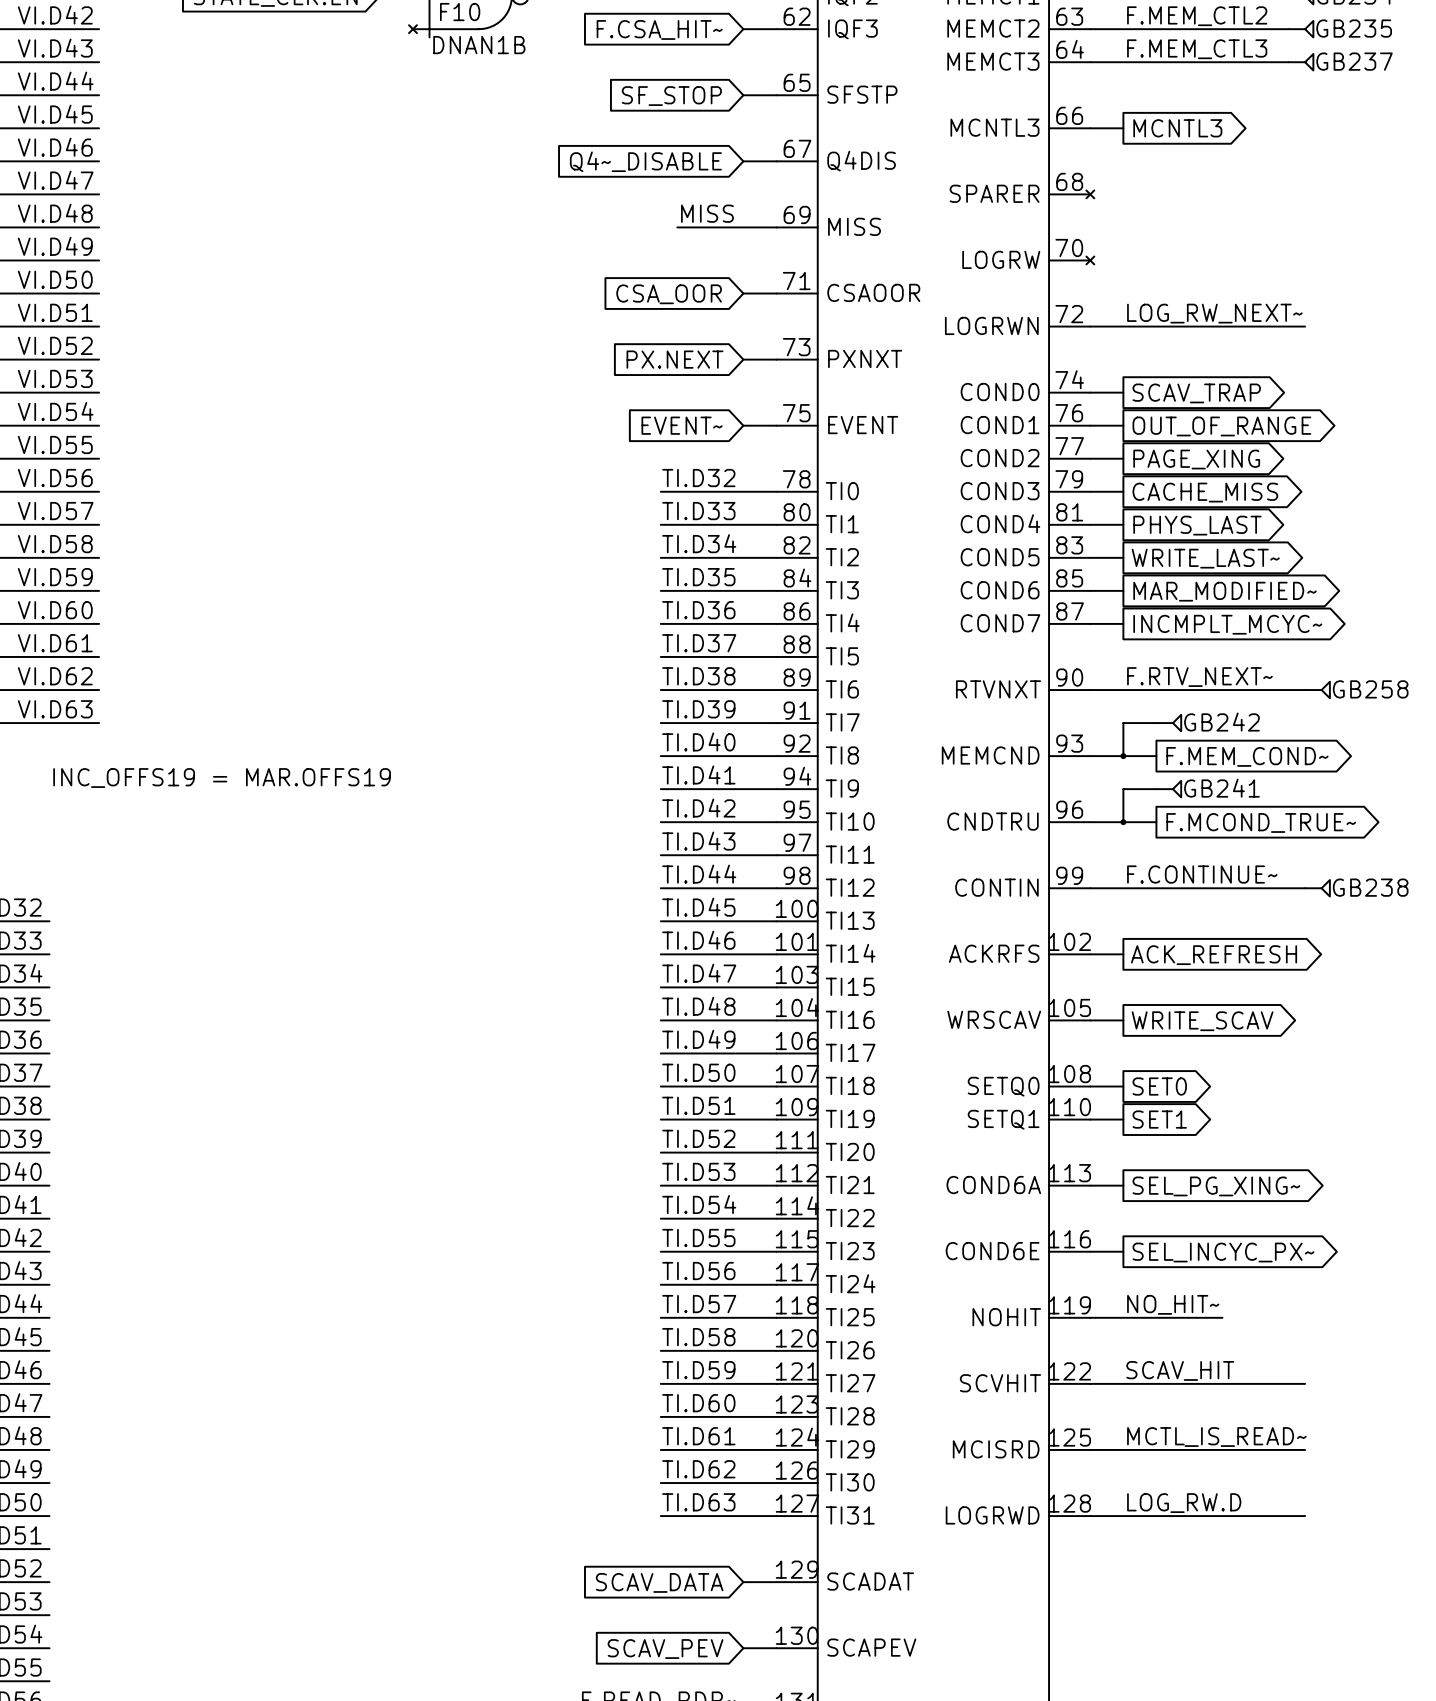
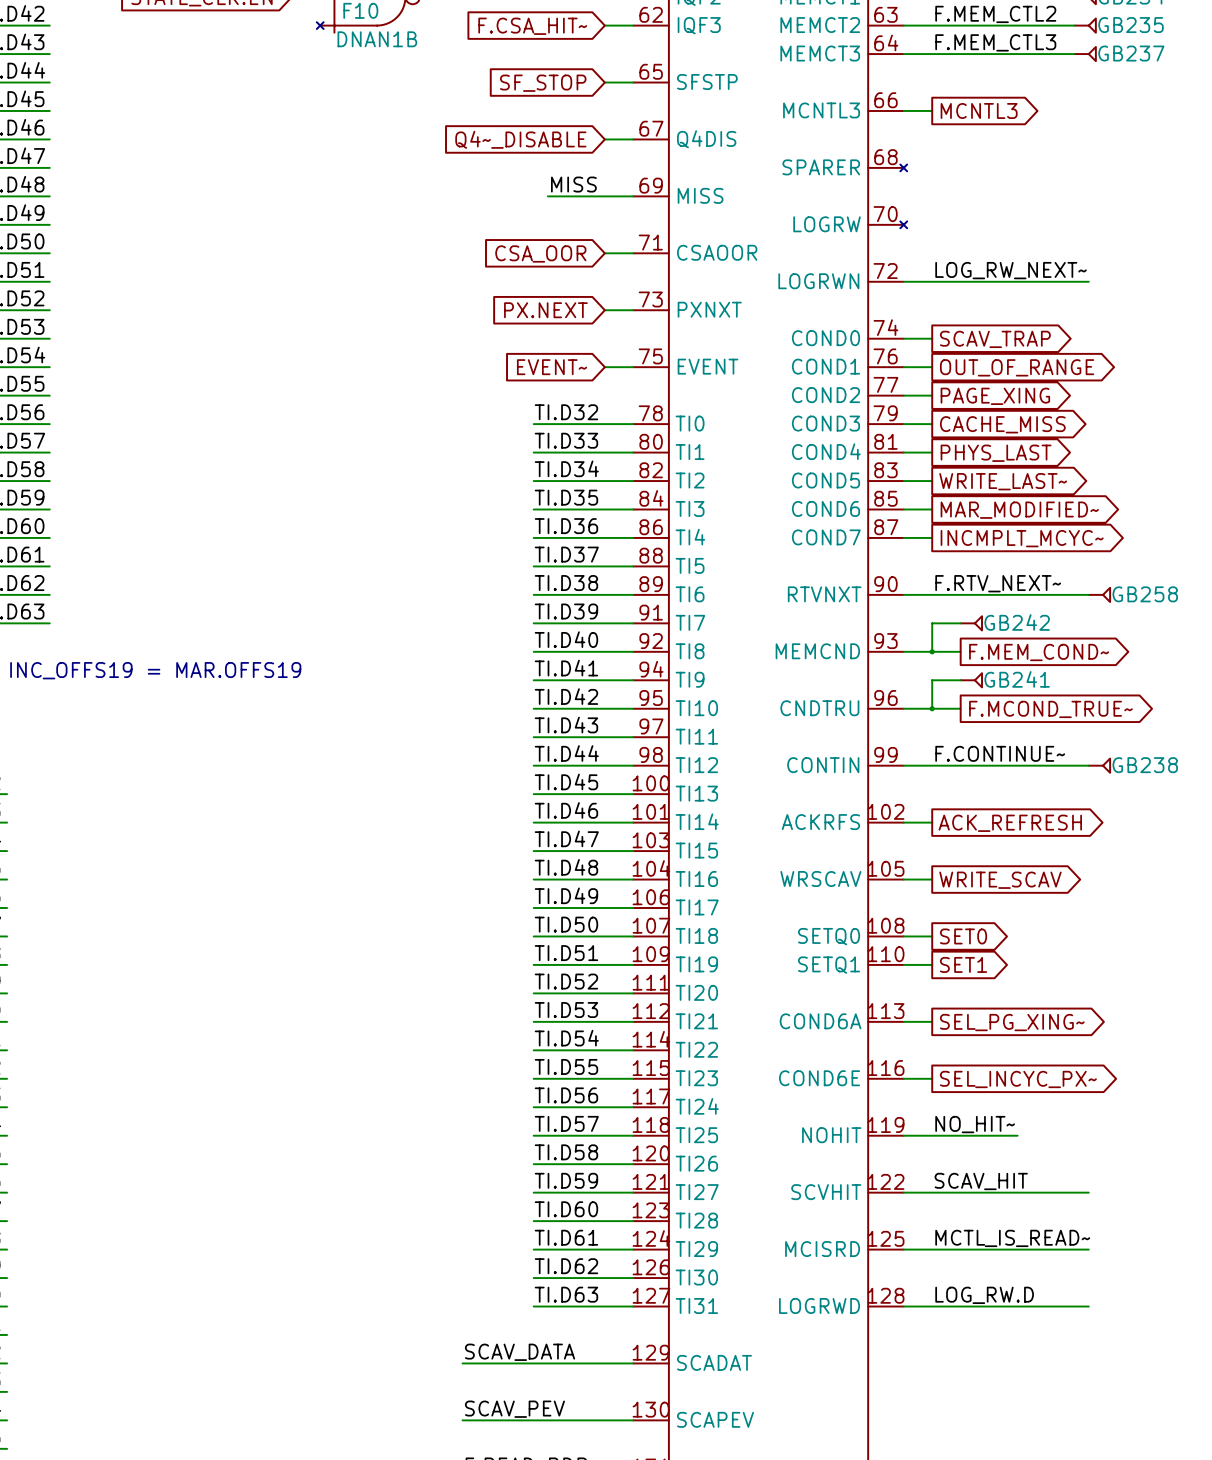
label: none -> SCAV_DATA (520, 1352)
wire: none -> (462, 1363) (604, 1363)
global label: SCAV_DATA (659, 1582) -> none
label: none -> SCAV_PEV (514, 1409)
wire: none -> (462, 1420) (604, 1420)
global label: SCAV_PEV (665, 1649) -> none

